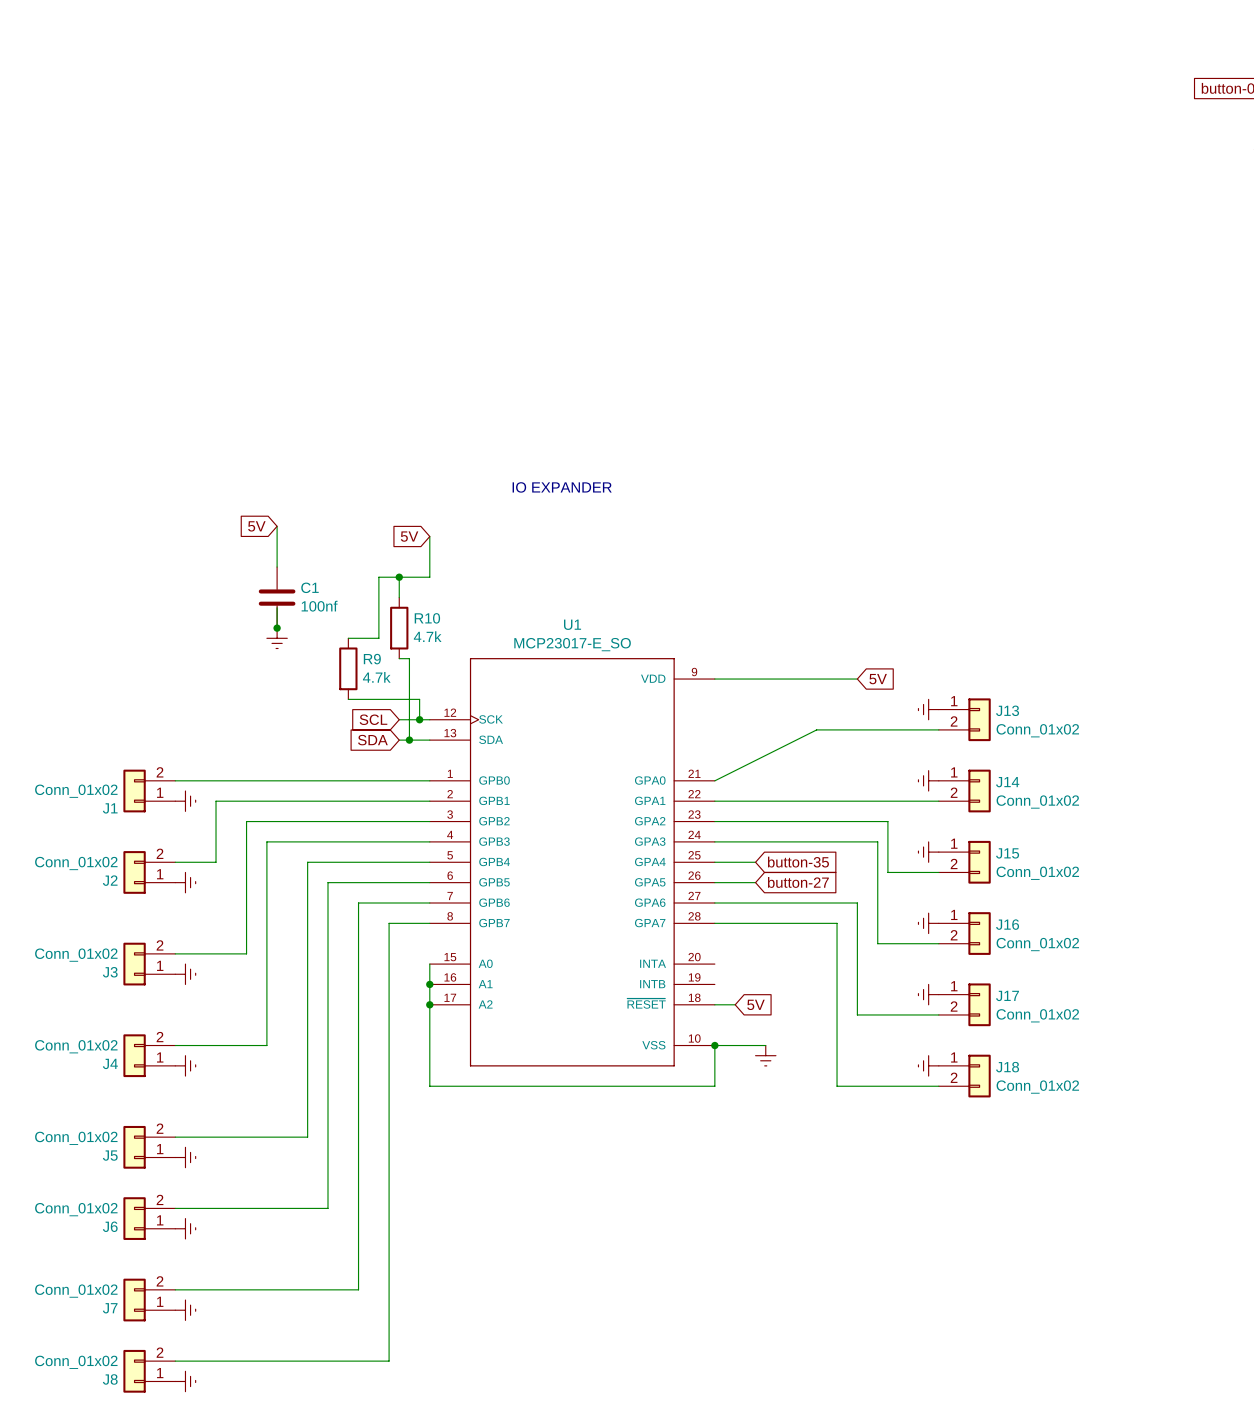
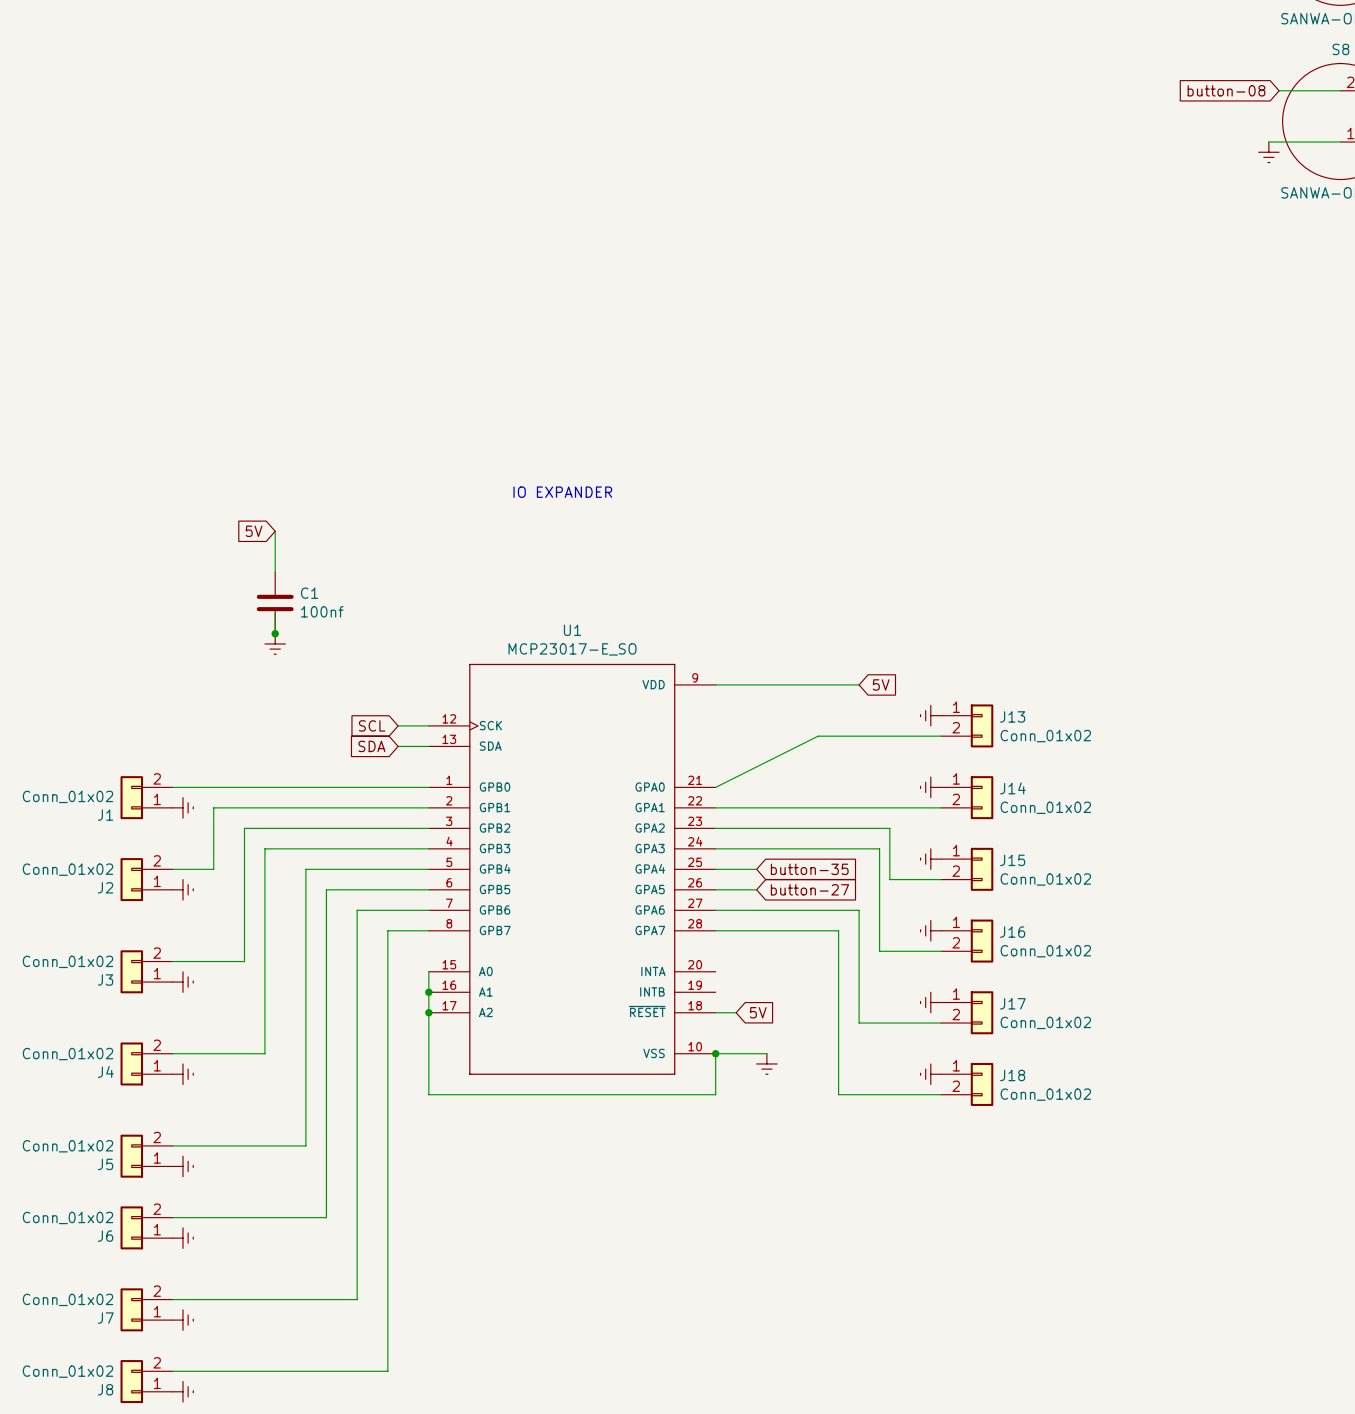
global label: 5V (409, 536) -> none
wire: (429, 536) (429, 577) (378, 577) (378, 638) (348, 638) -> none
wire: (399, 577) (399, 597) -> none
junction: (399, 577) -> none
R10: 4.7k (399, 628) -> none
wire: (399, 658) (409, 658) (409, 740) -> none
R9: 4.7k (348, 668) -> none
wire: (348, 699) (419, 699) (419, 719) -> none
junction: (419, 719) -> none
junction: (409, 740) -> none

